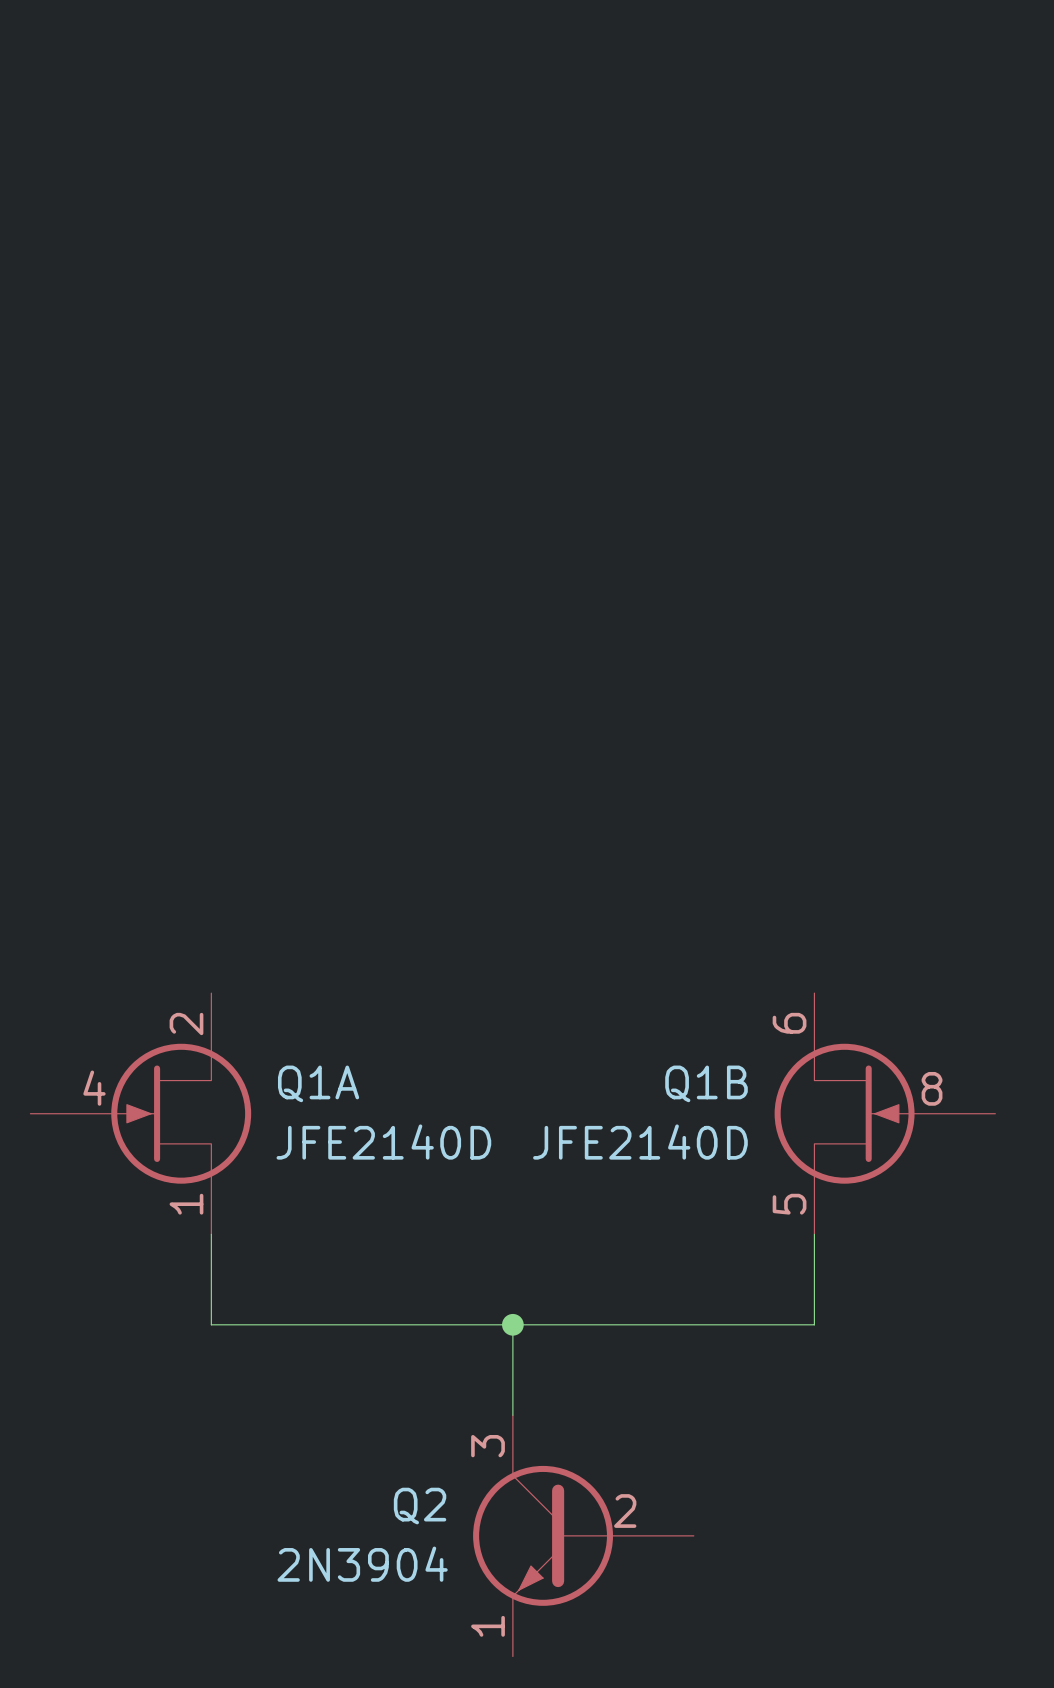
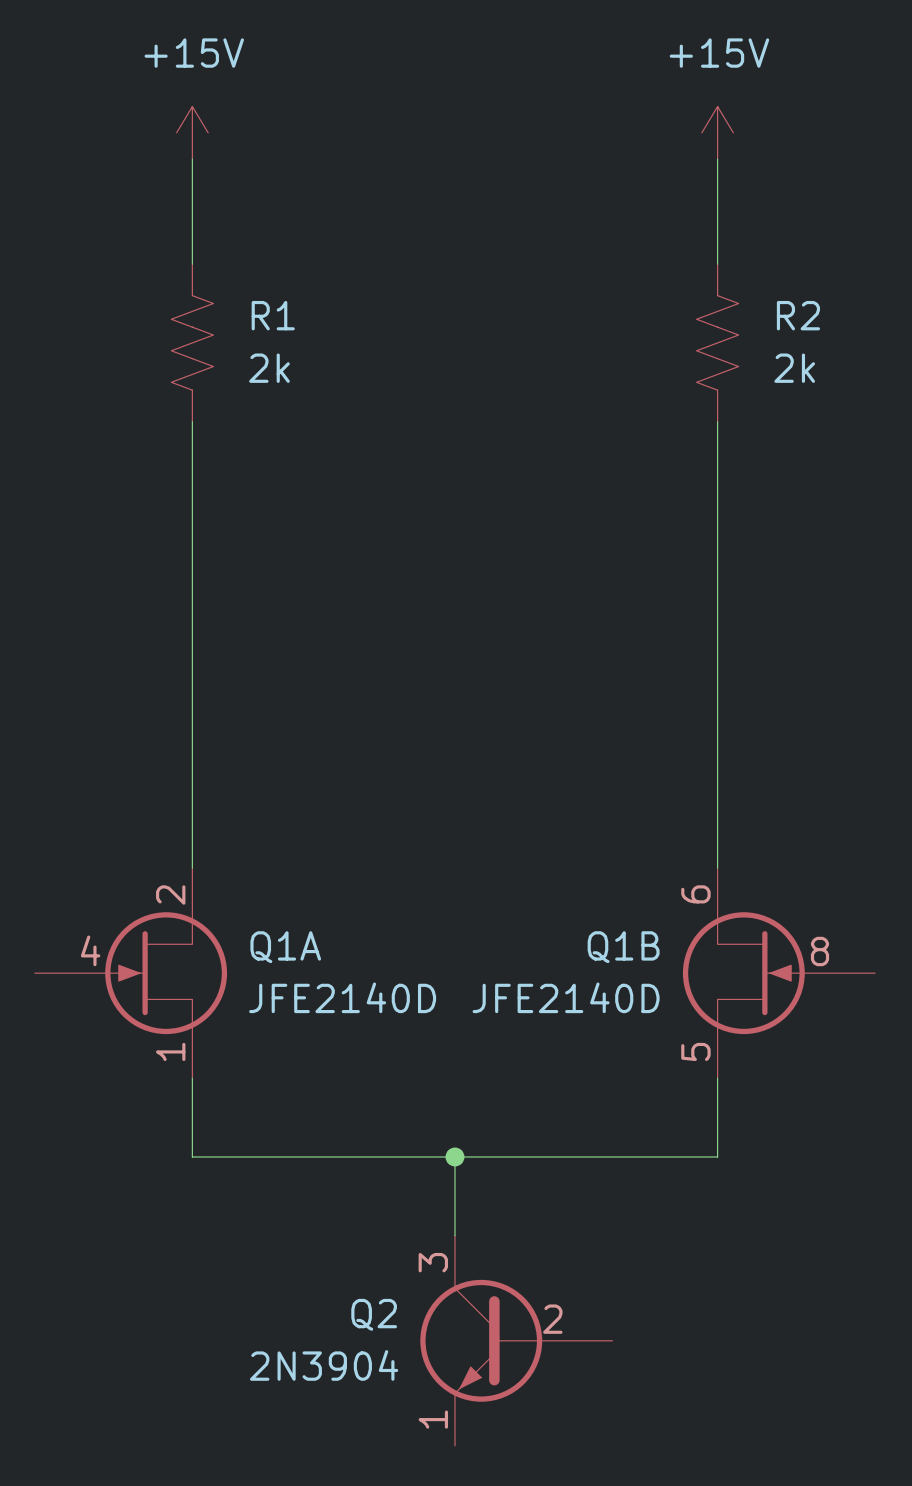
power symbol: none -> +15V (192, 132)
power symbol: none -> +15V (717, 132)
wire: none -> (192, 159) (192, 264)
wire: none -> (717, 159) (717, 264)
R1: none -> 2k (192, 342)
R2: none -> 2k (717, 342)
wire: none -> (192, 421) (192, 868)
wire: none -> (717, 421) (717, 868)

